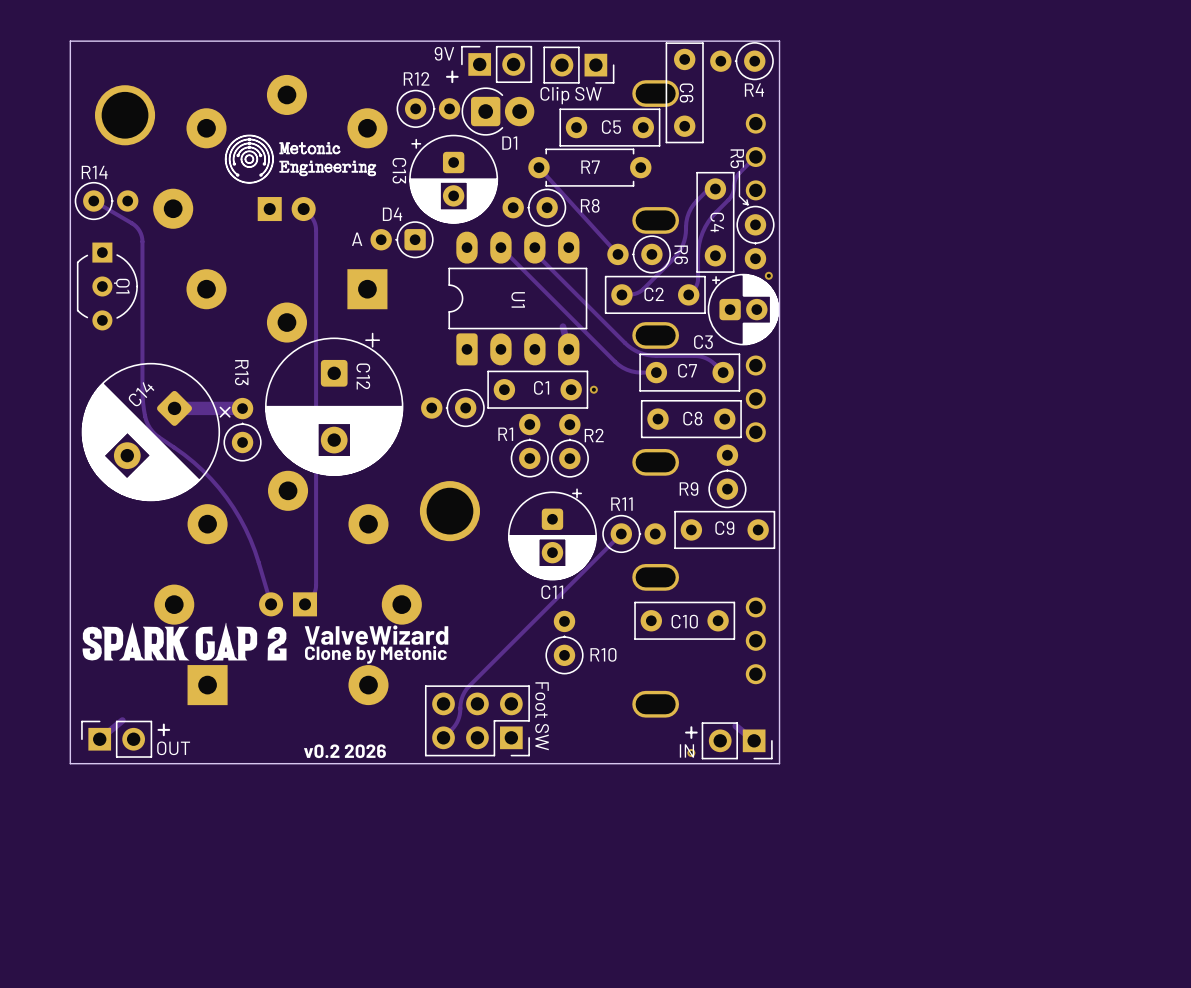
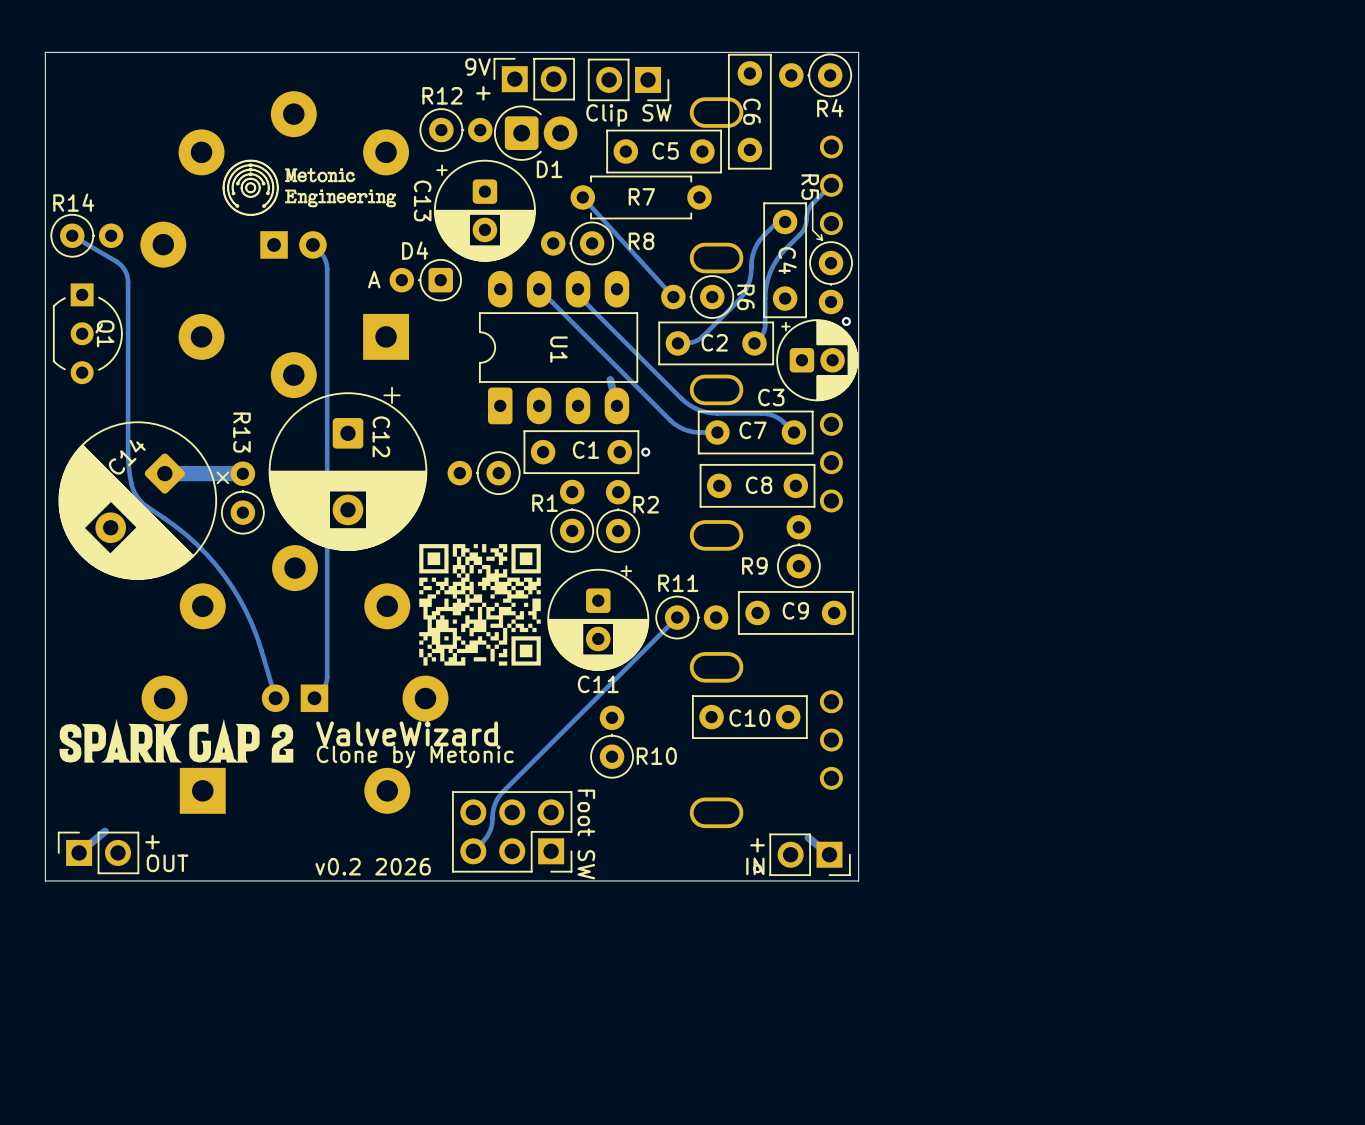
part: (125, 115) -> none
drawing: none -> [419, 544, 541, 666]
part: (449, 511) -> none

